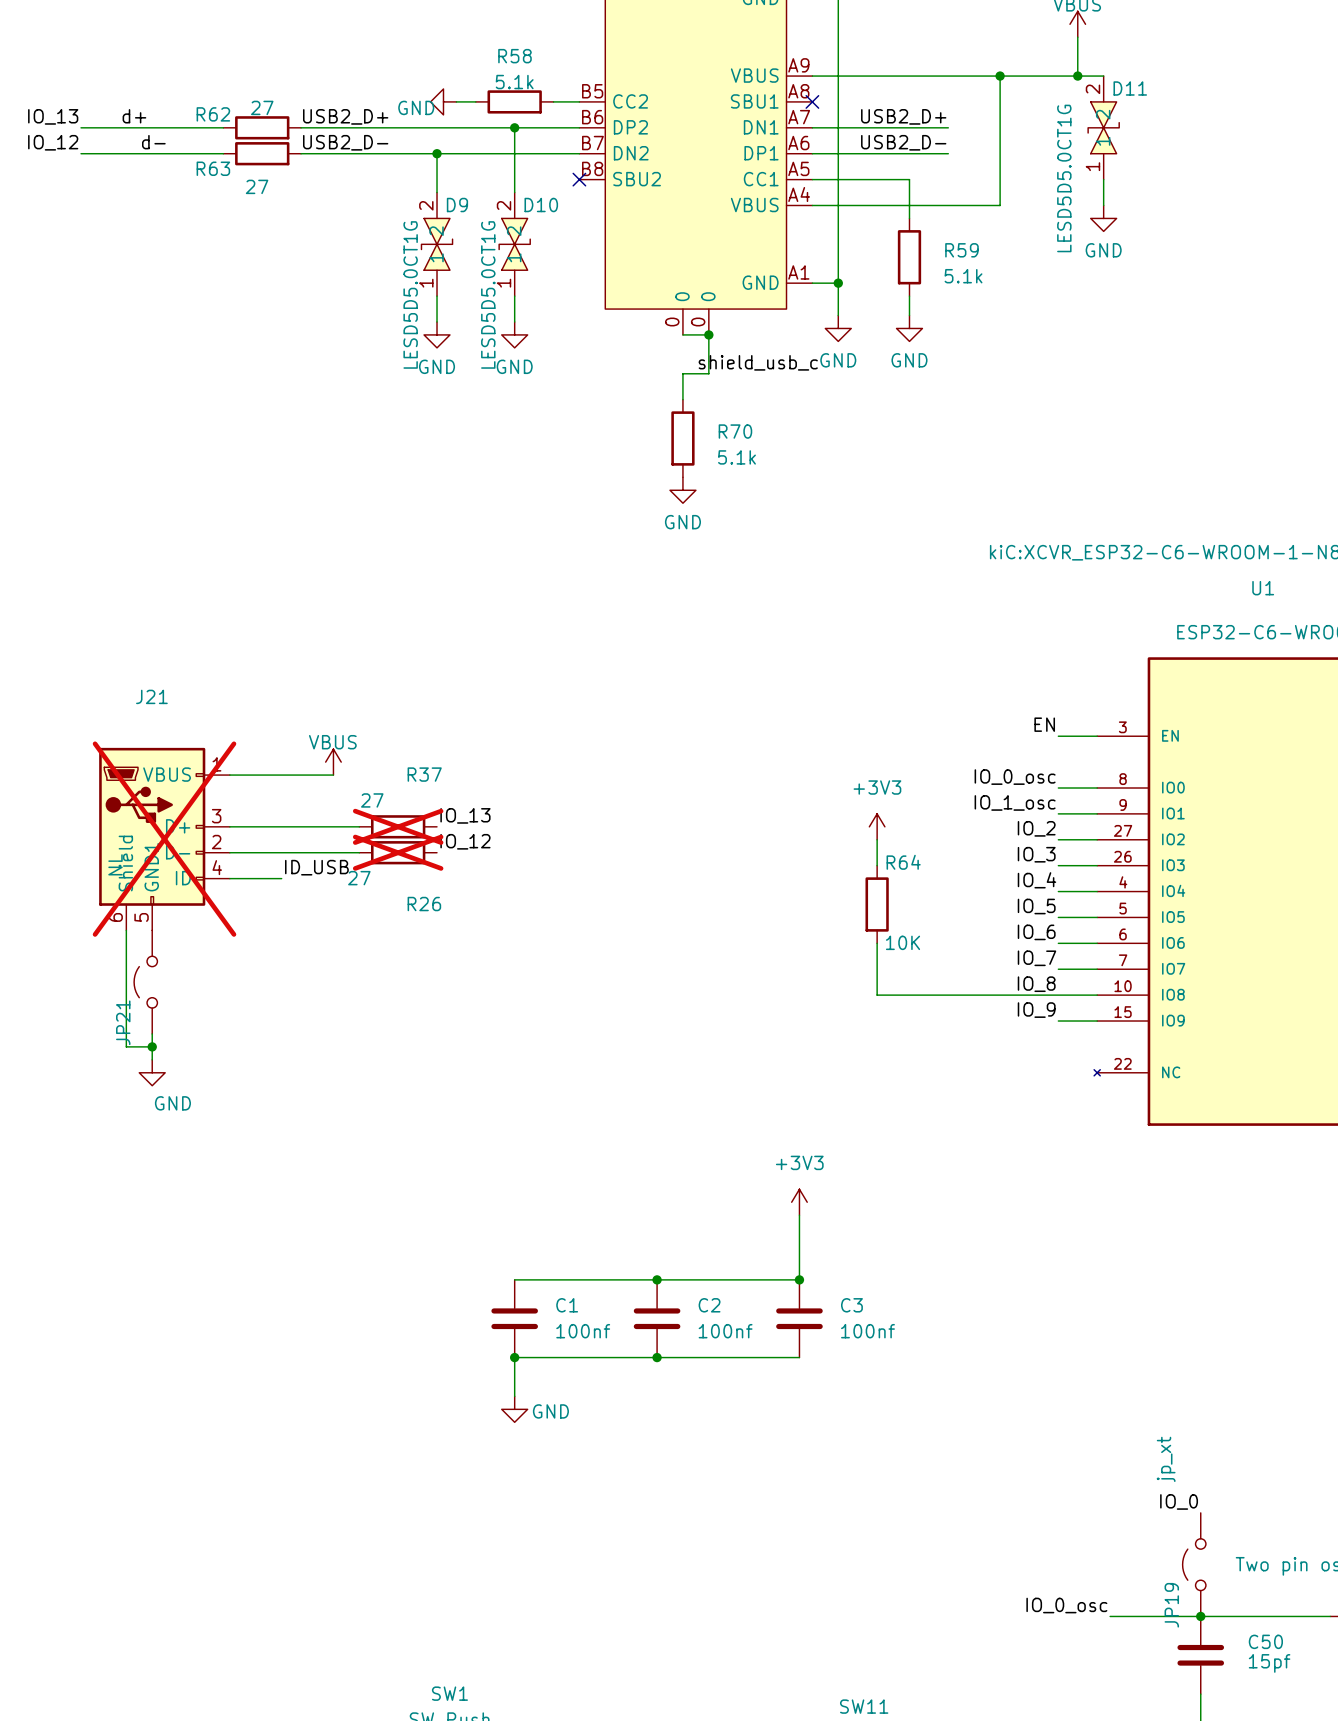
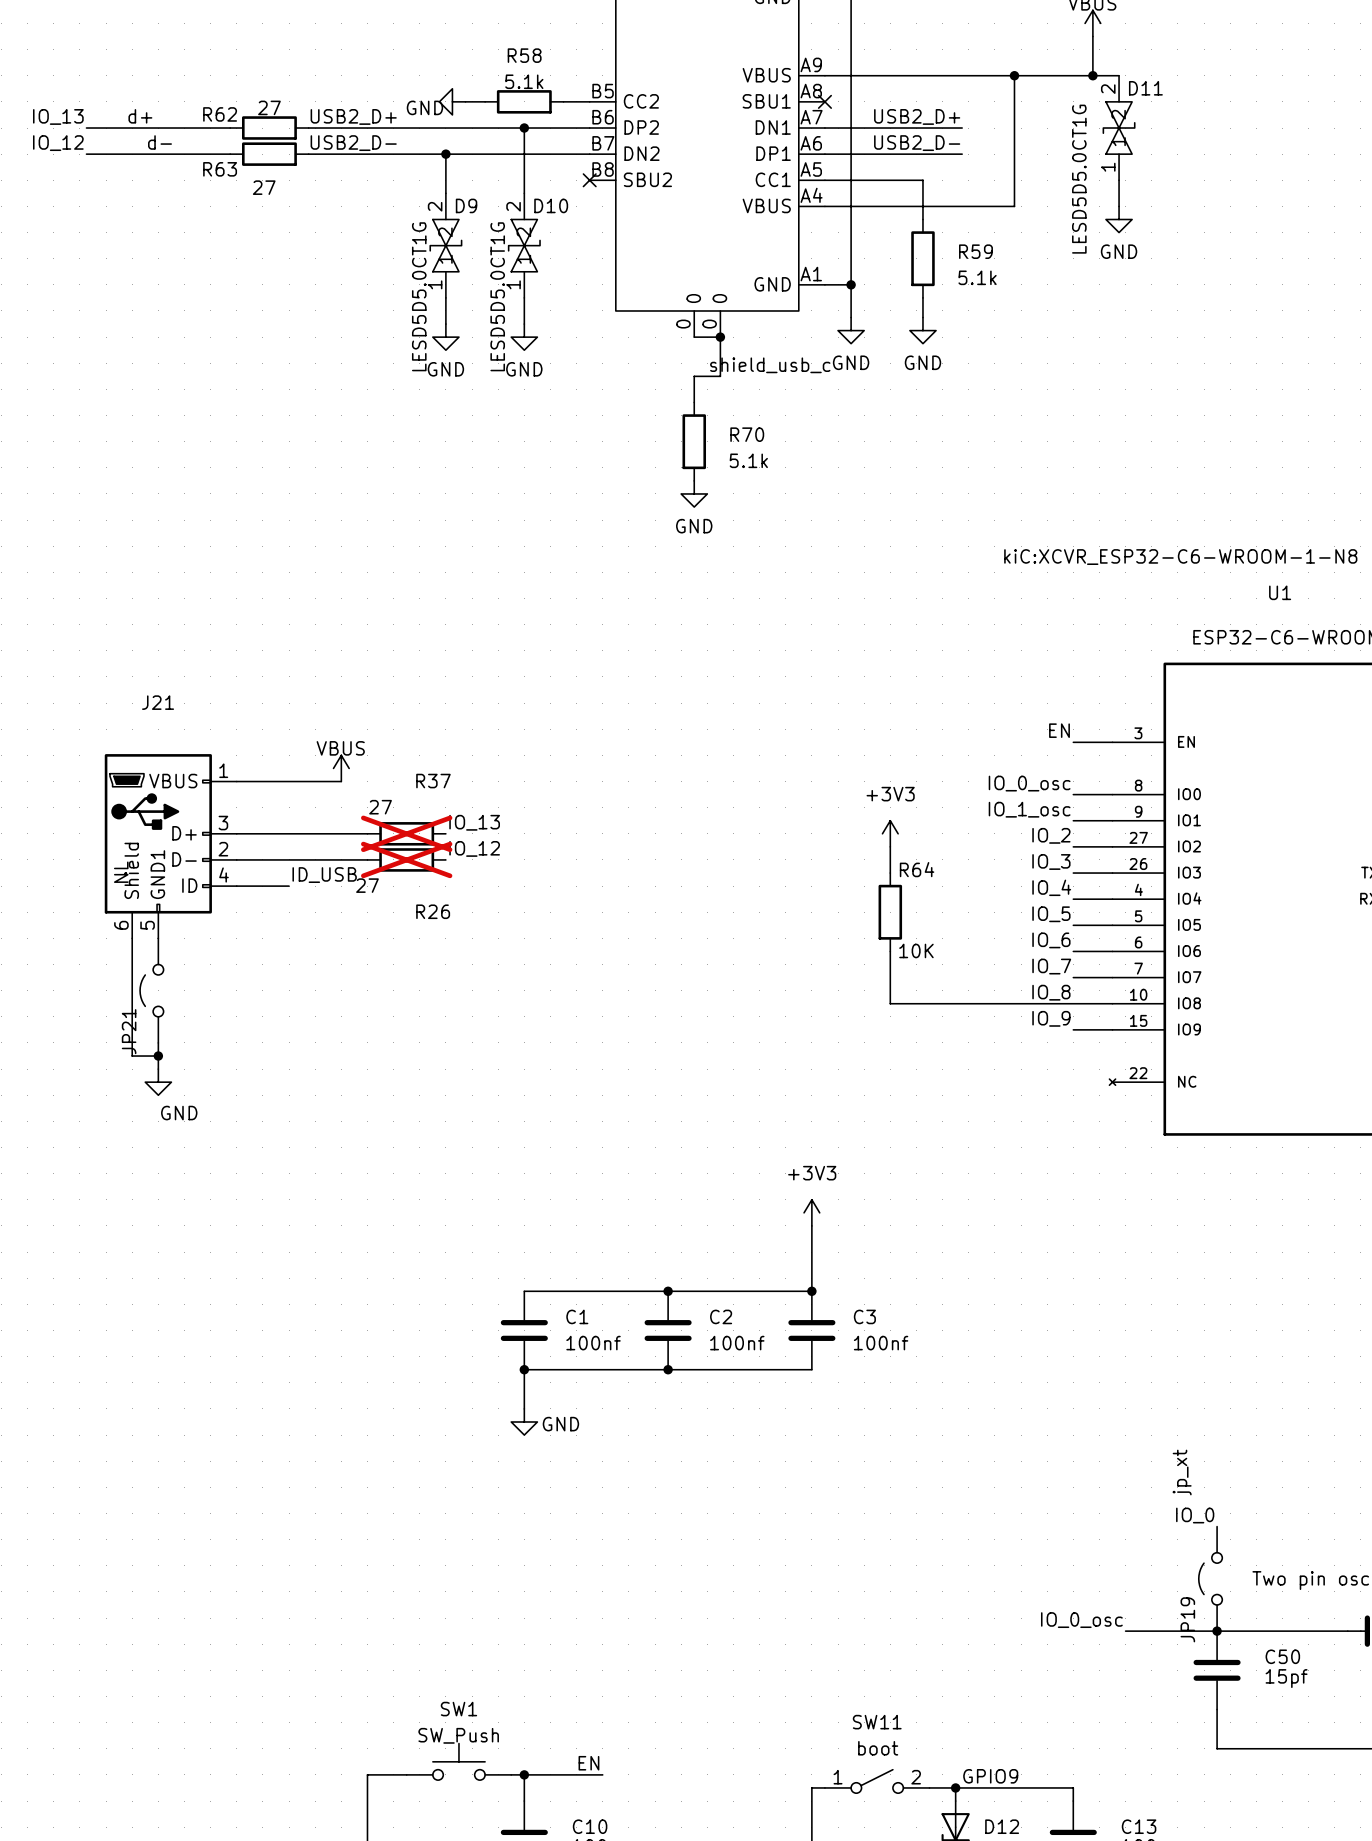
J21 do-not-place cross: (164, 839) -> none

